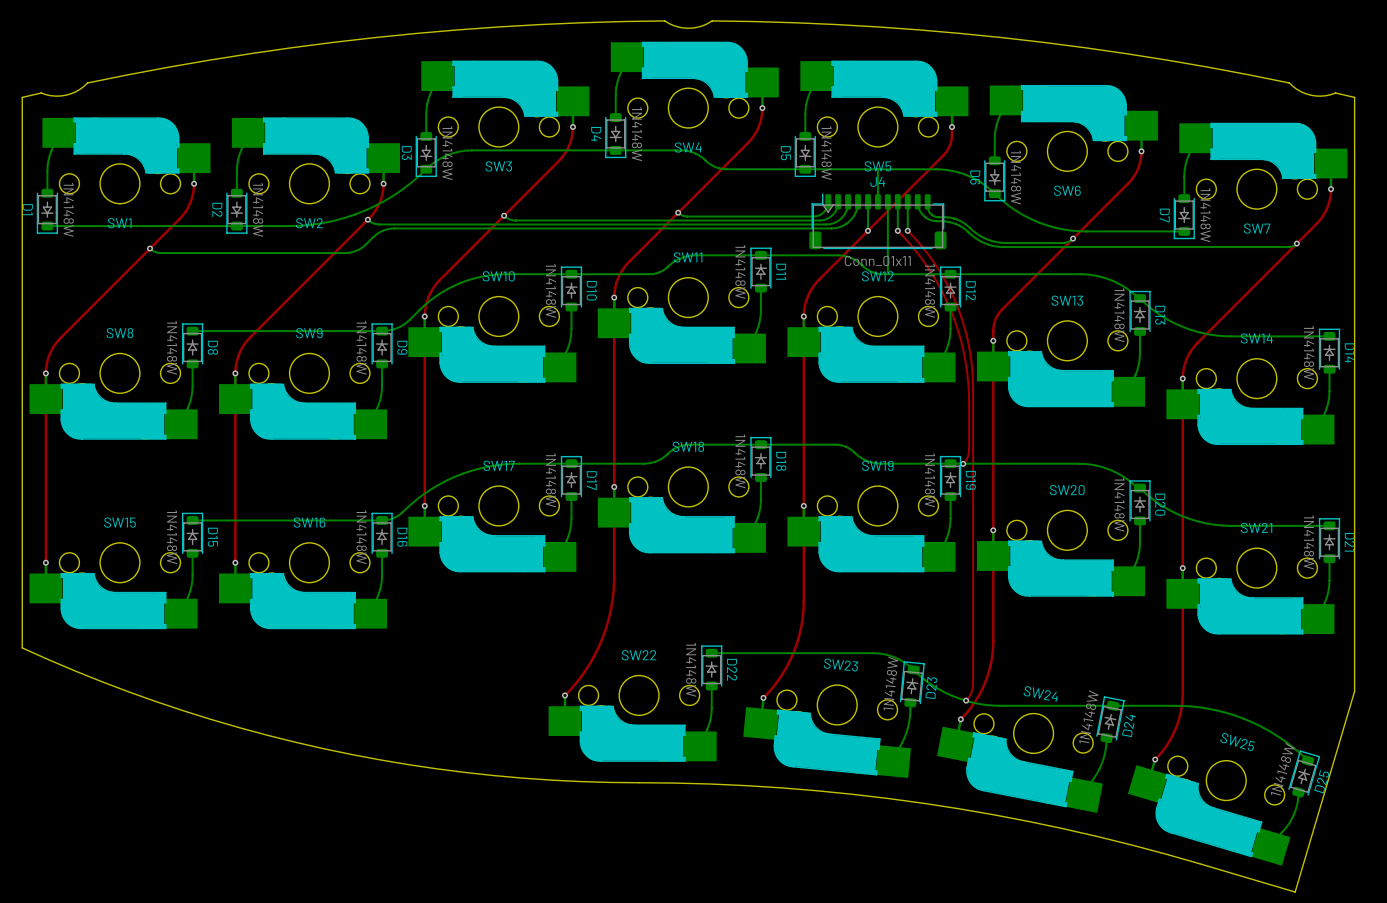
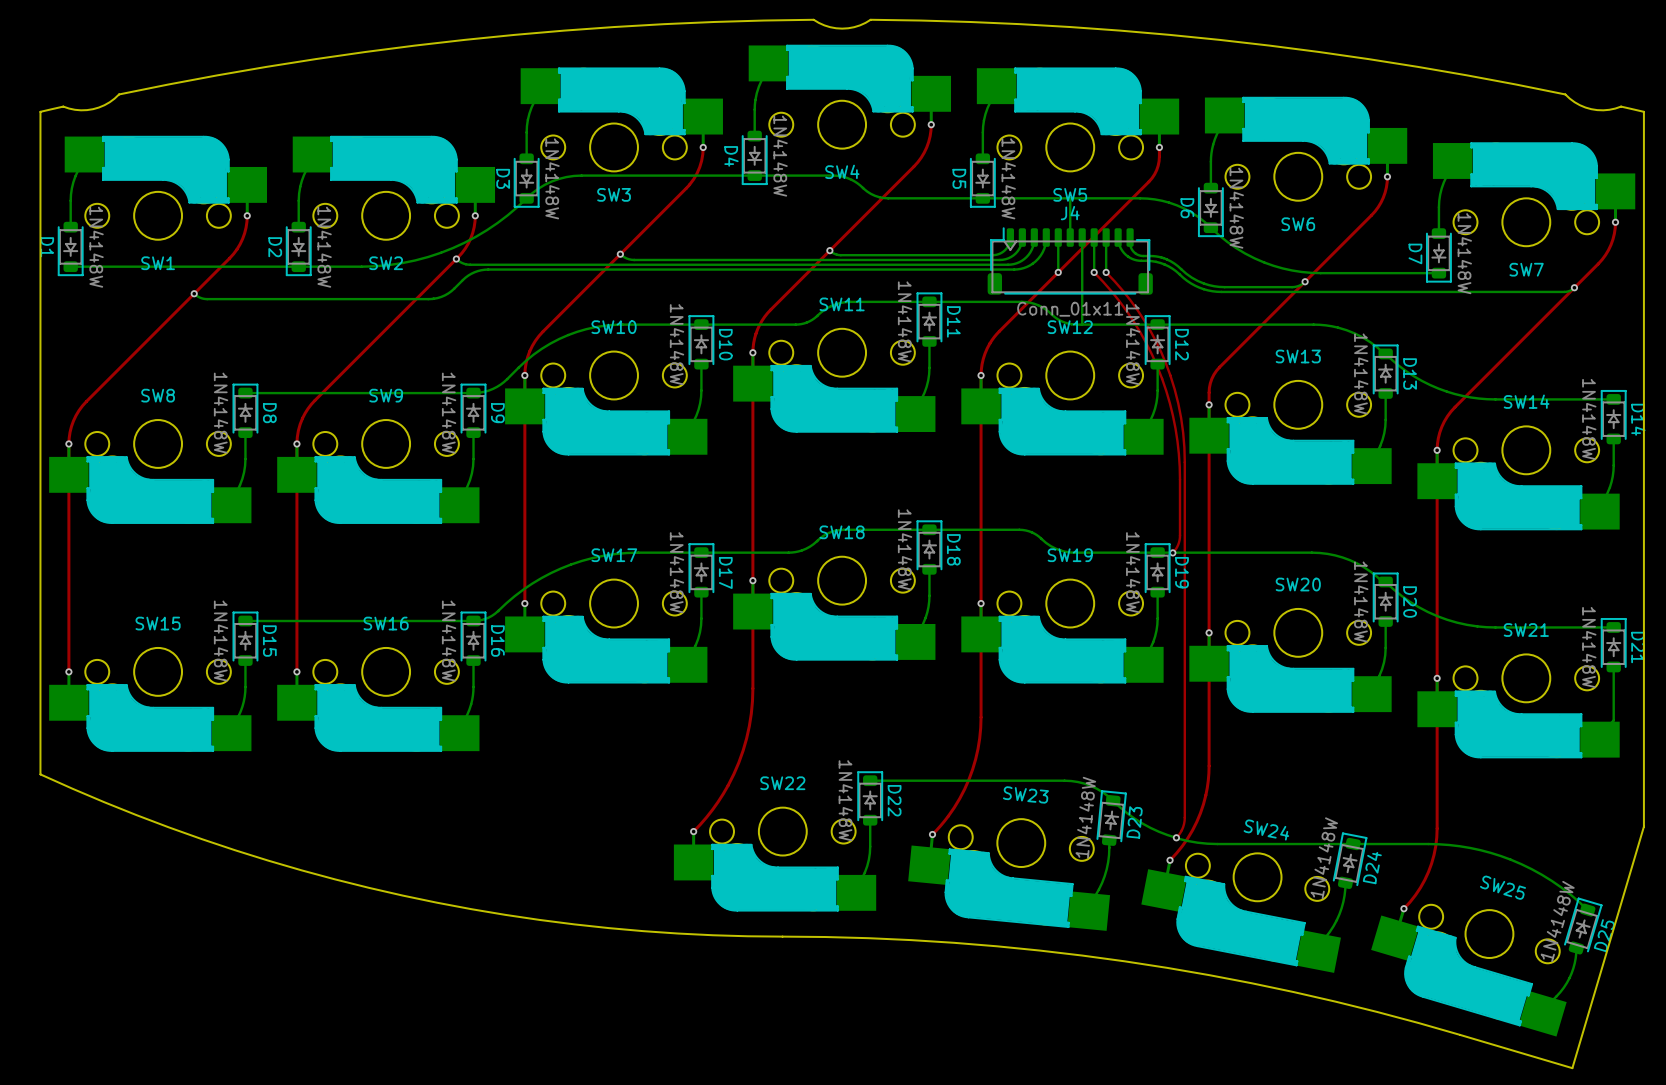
bottom track: (1329, 580) (1323, 604) -> (1613, 693) (1613, 720) (1594, 739)

